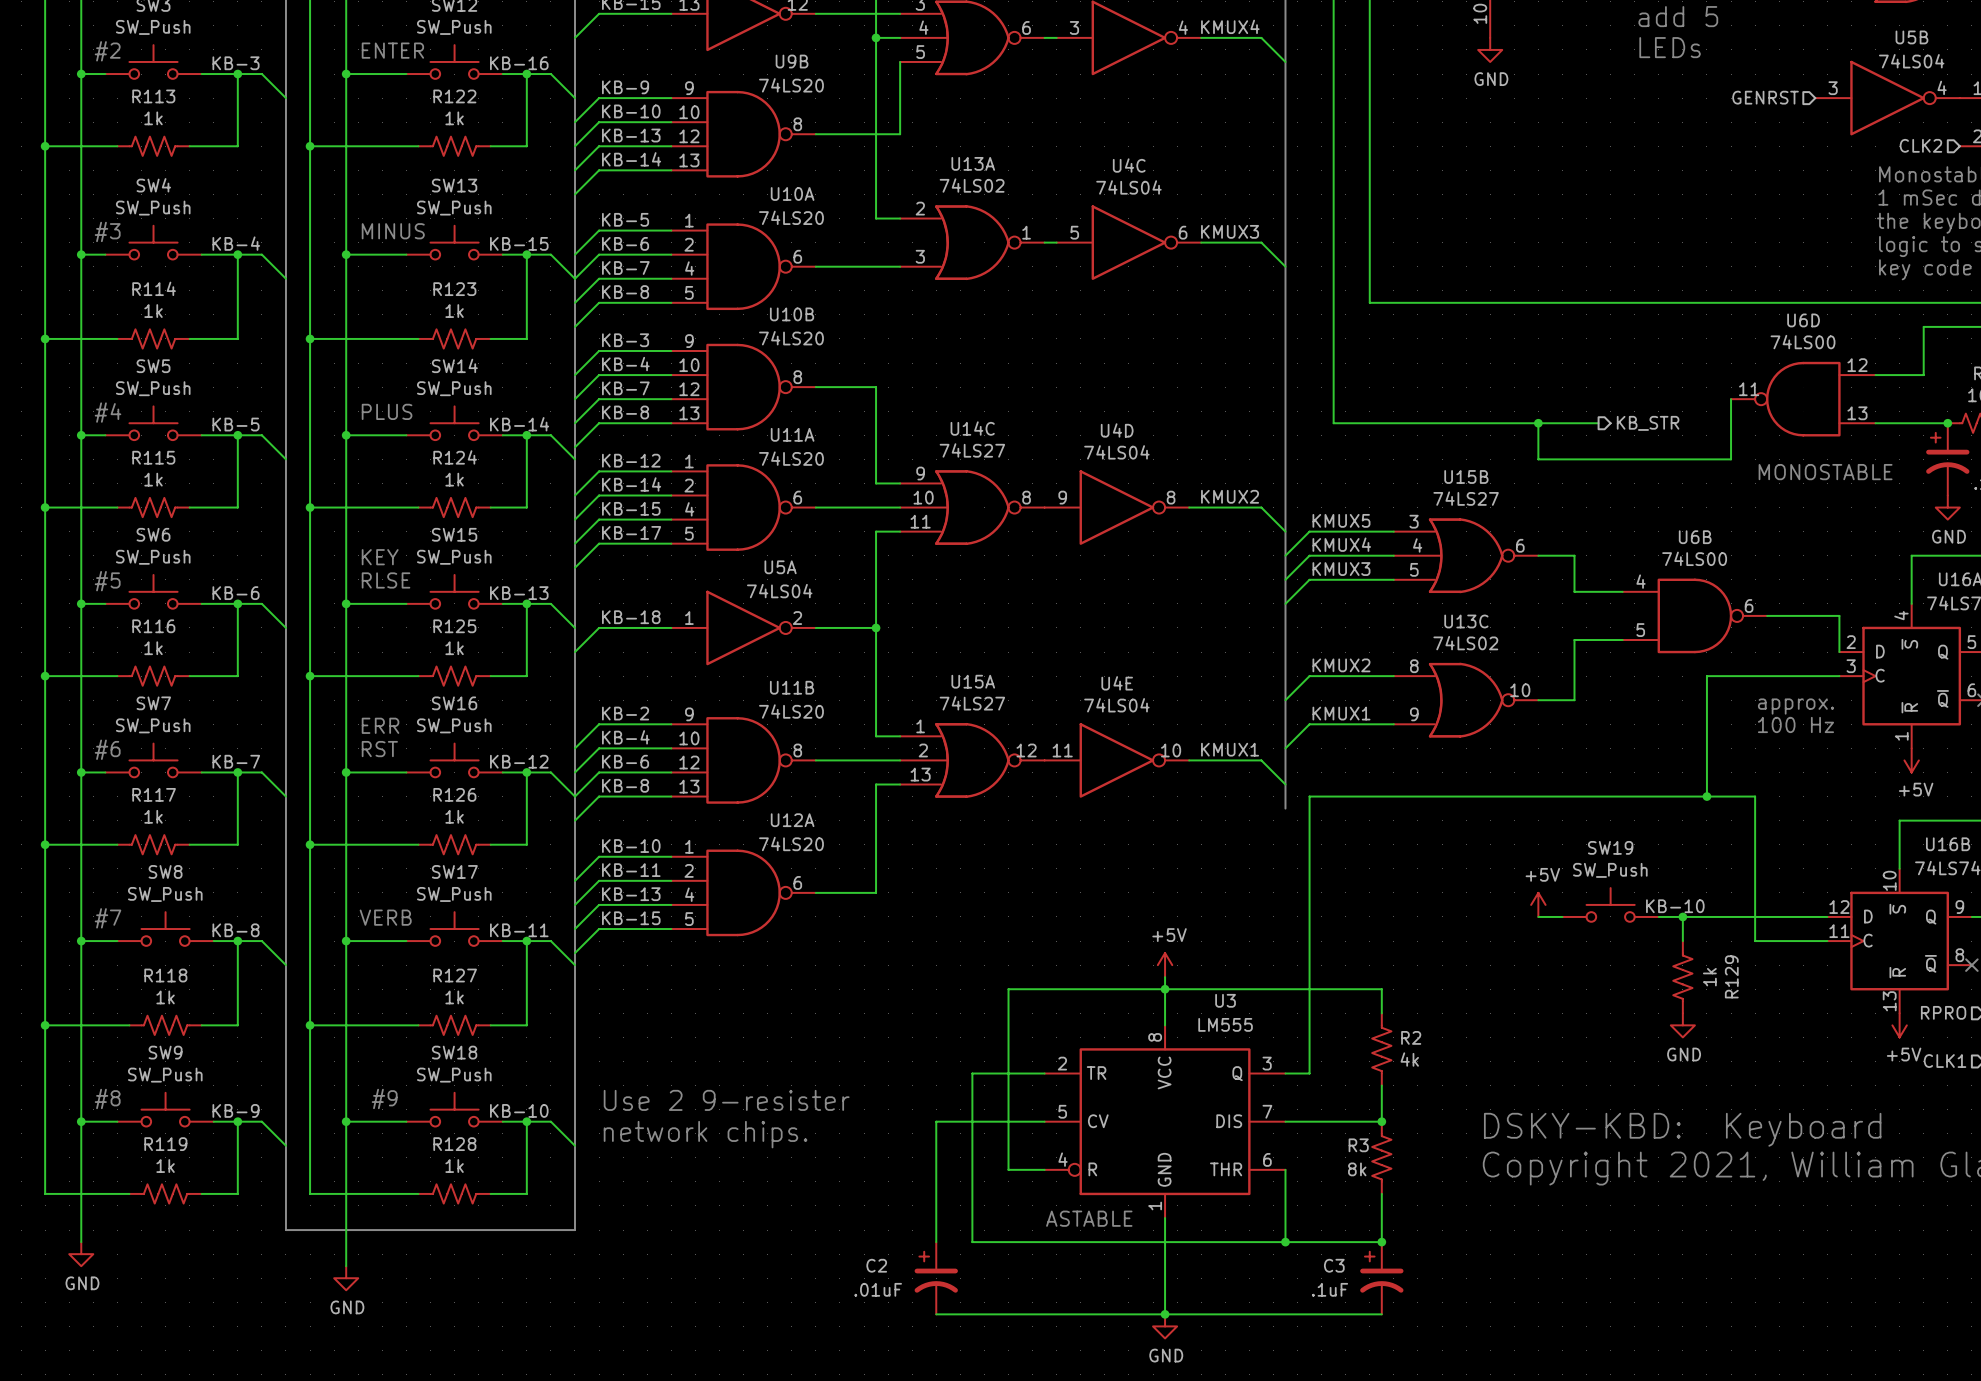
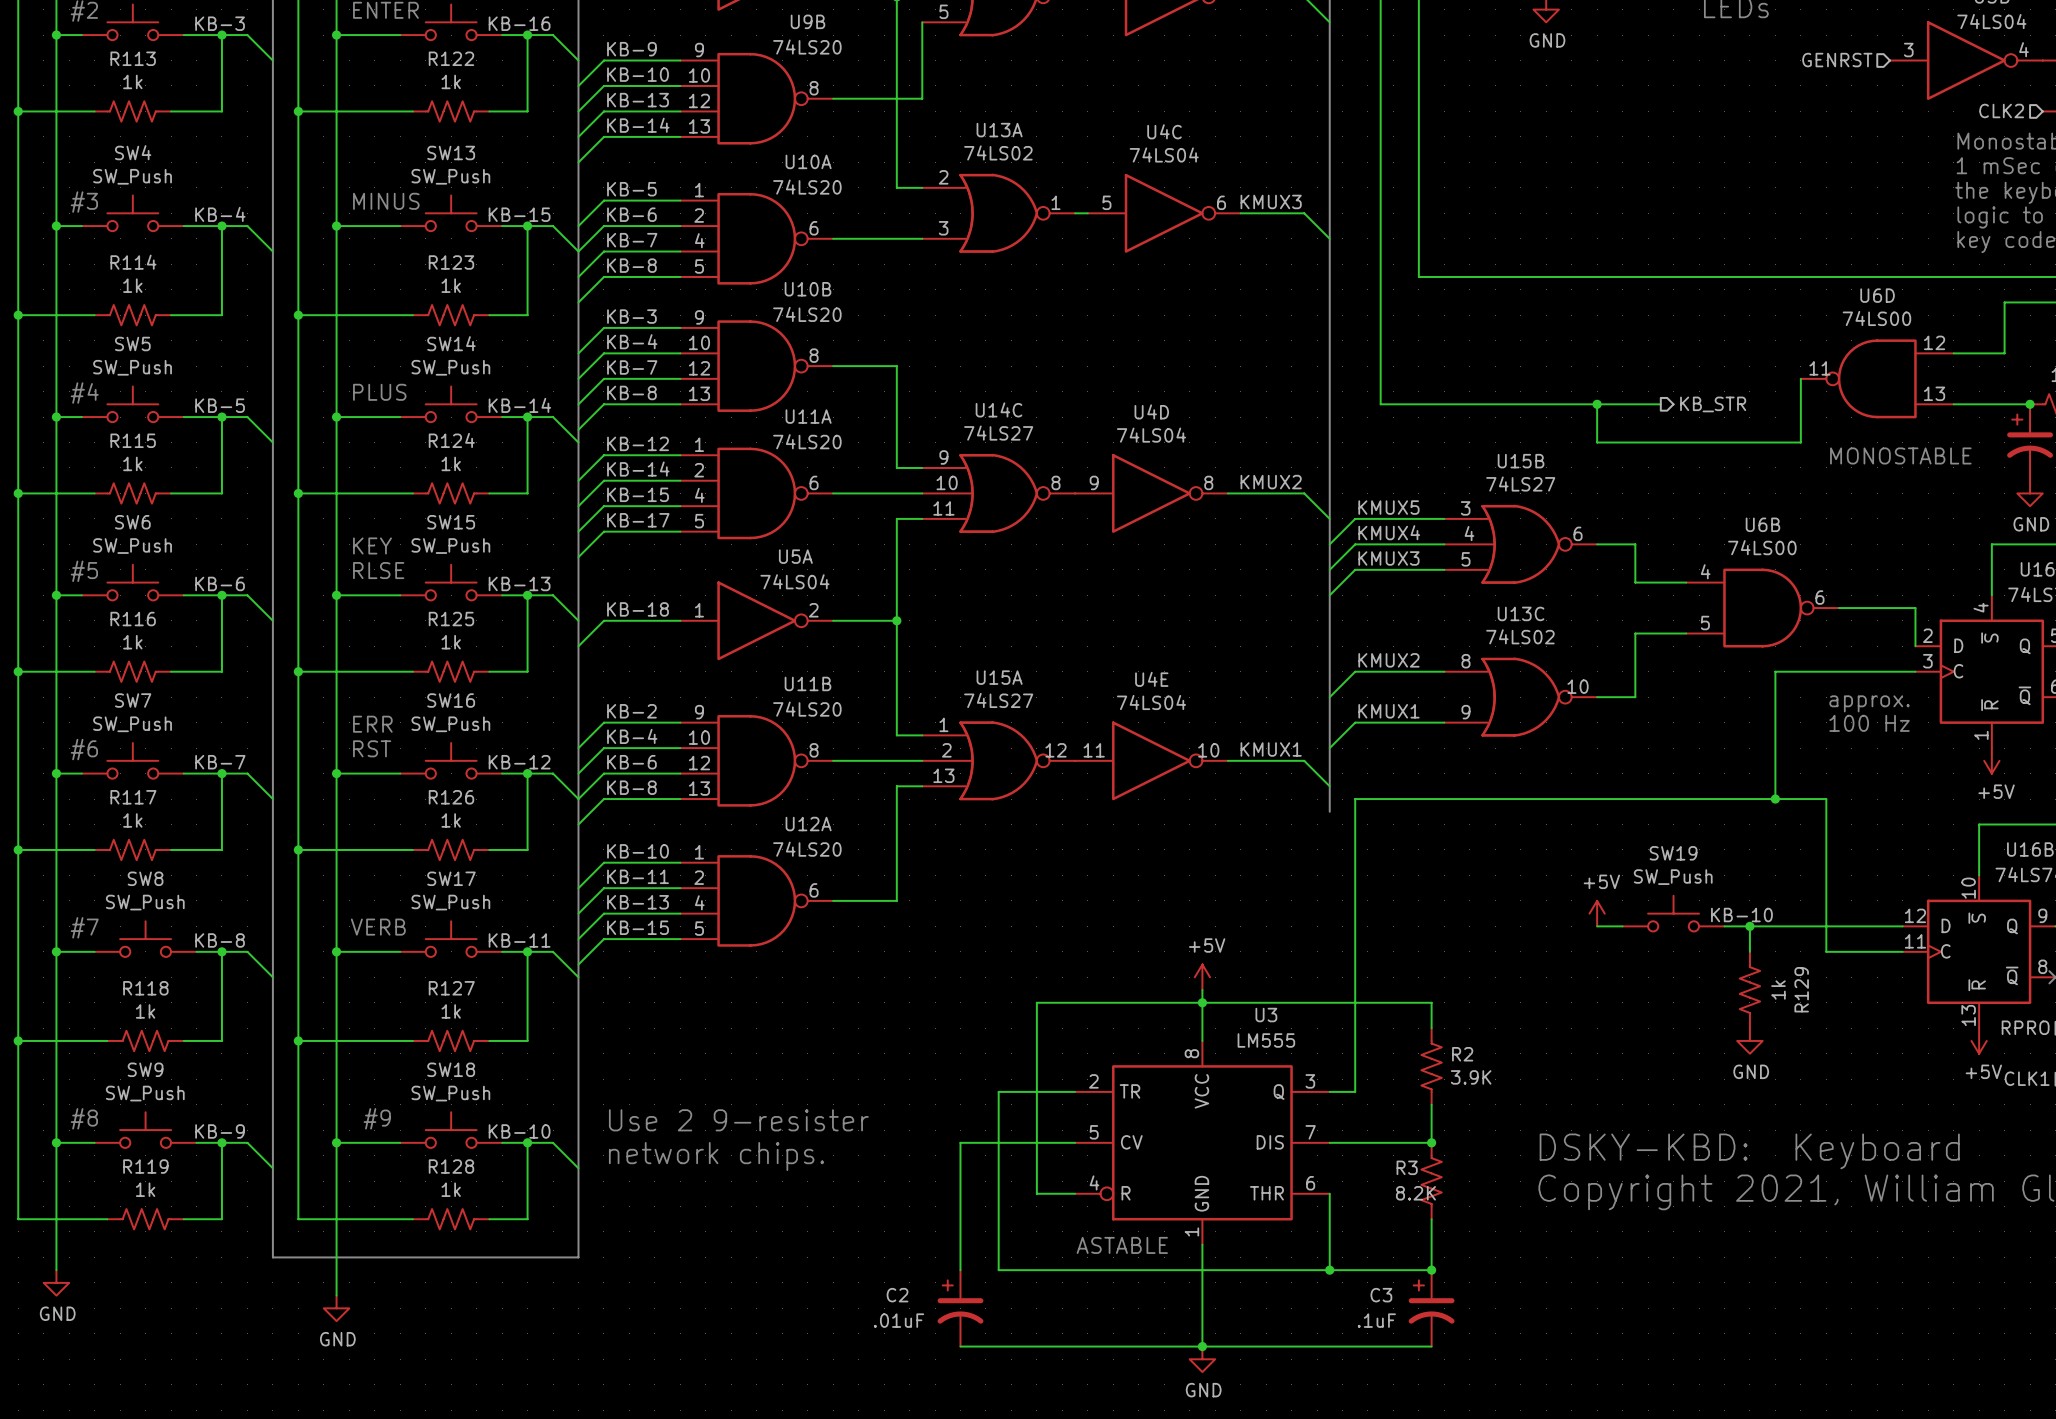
R2 value: 4k (1409, 1059) -> 3.9K (1471, 1077)
R3 value: 8k (1357, 1169) -> 8.2K (1415, 1193)

